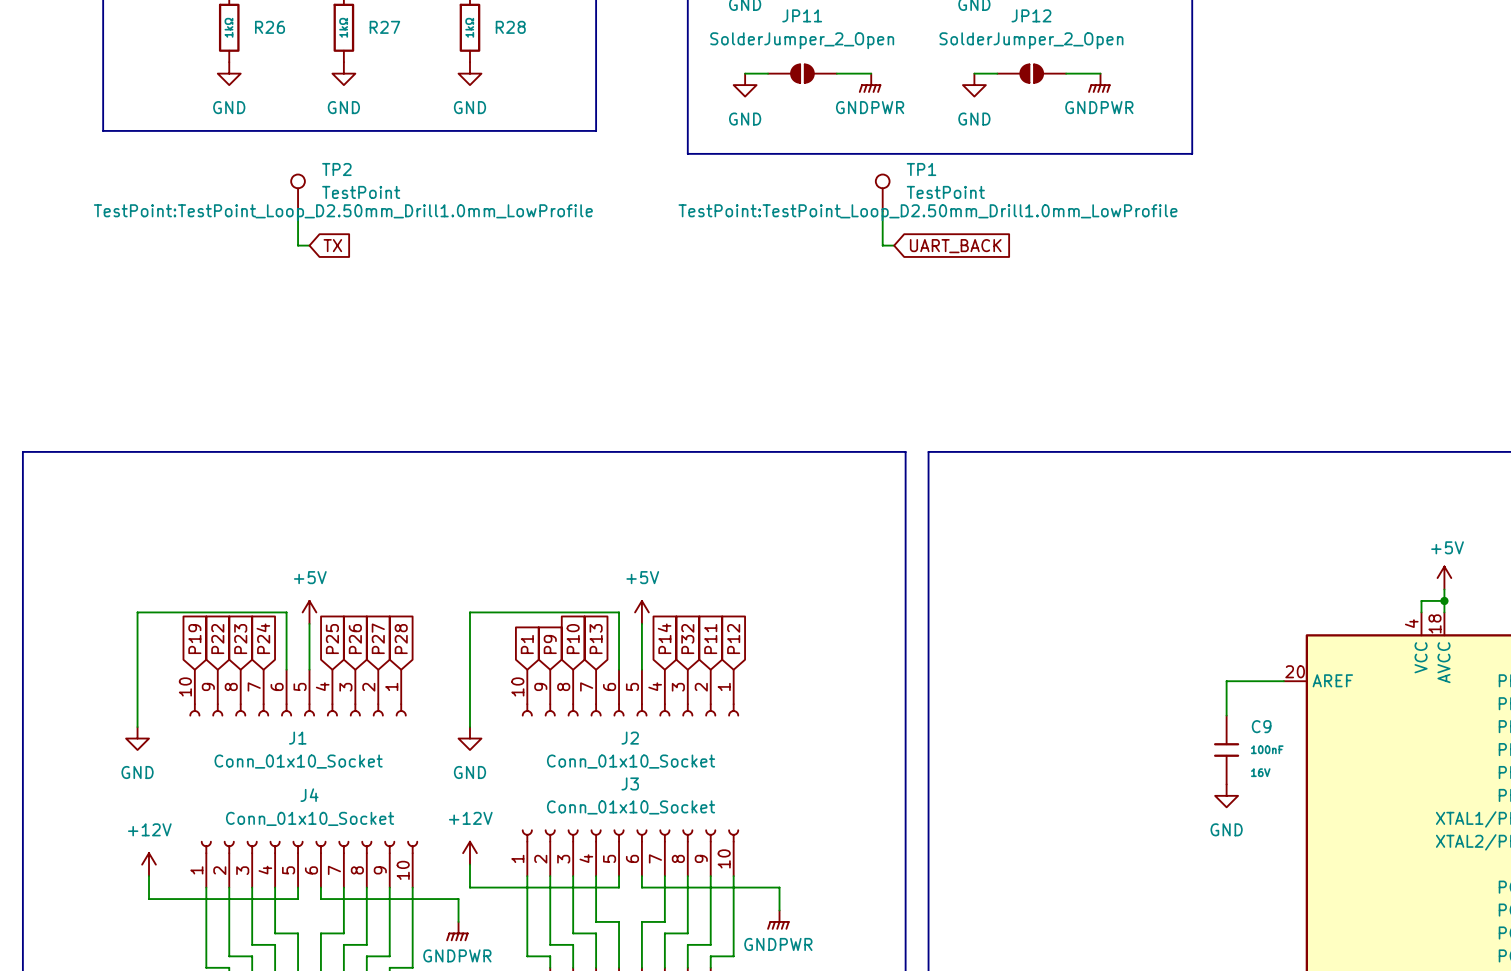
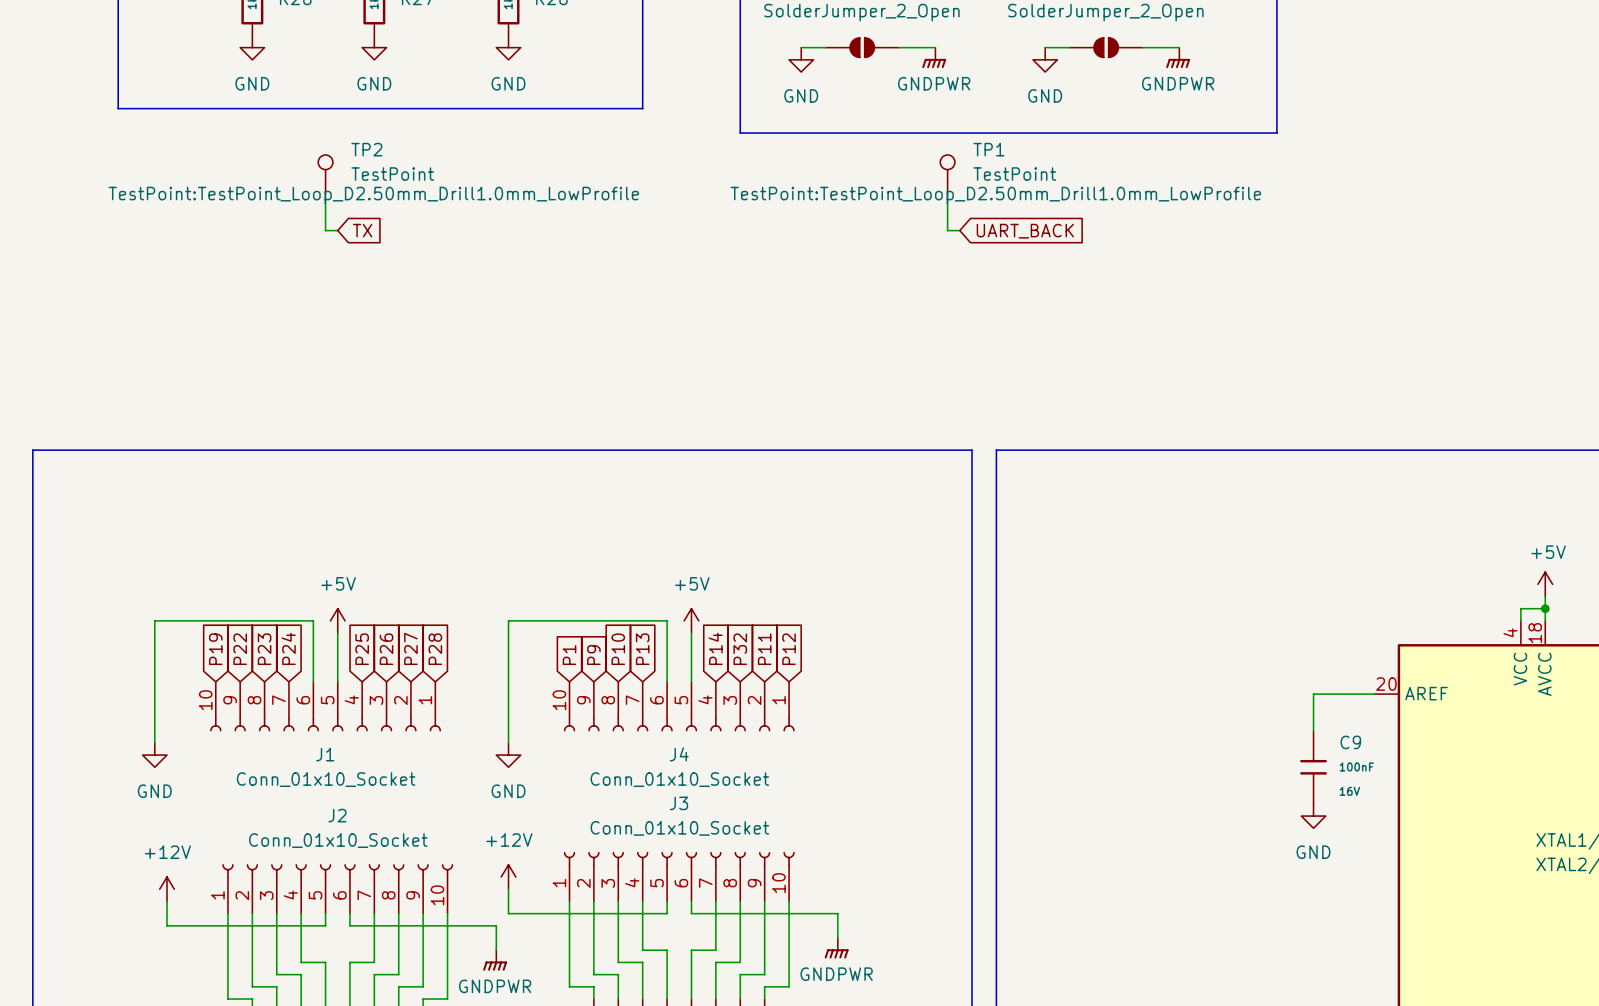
J2 name: J2 (630, 738) -> J4 (679, 754)
J4 name: J4 (309, 795) -> J2 (337, 815)

